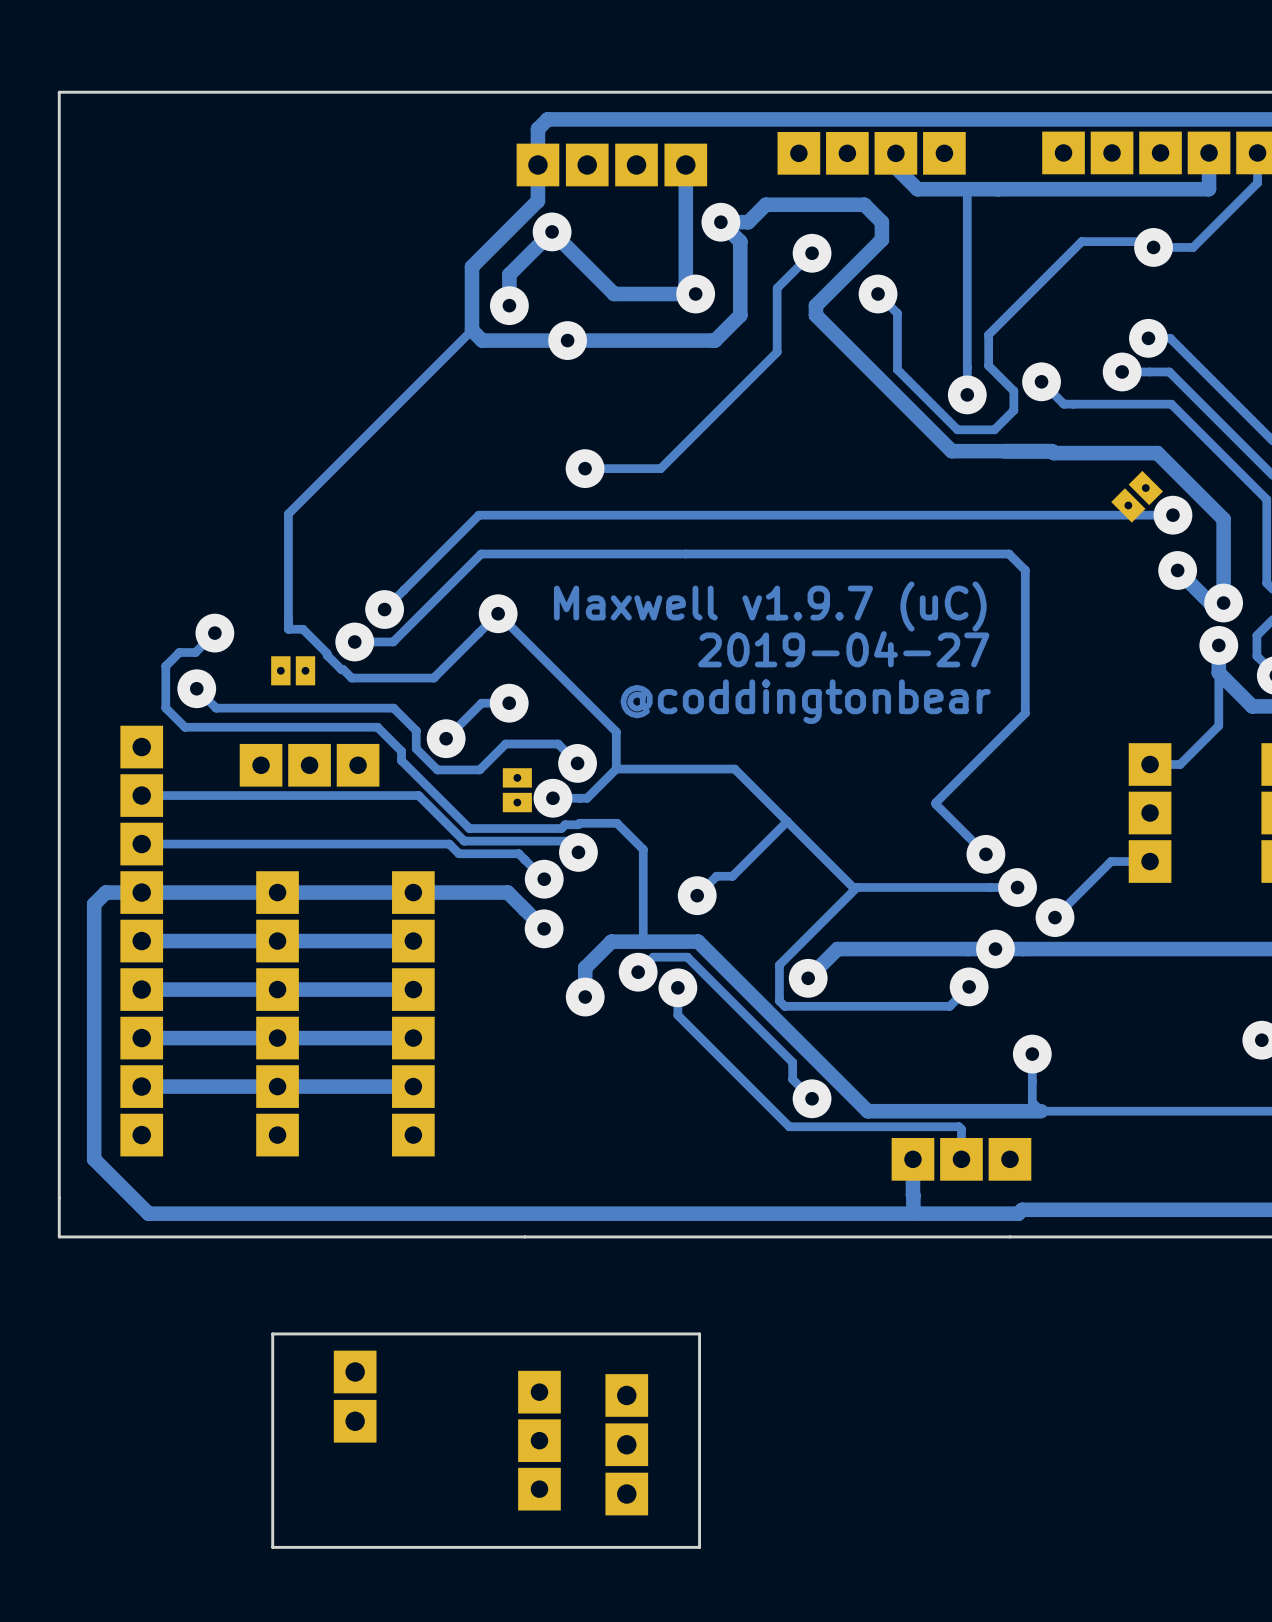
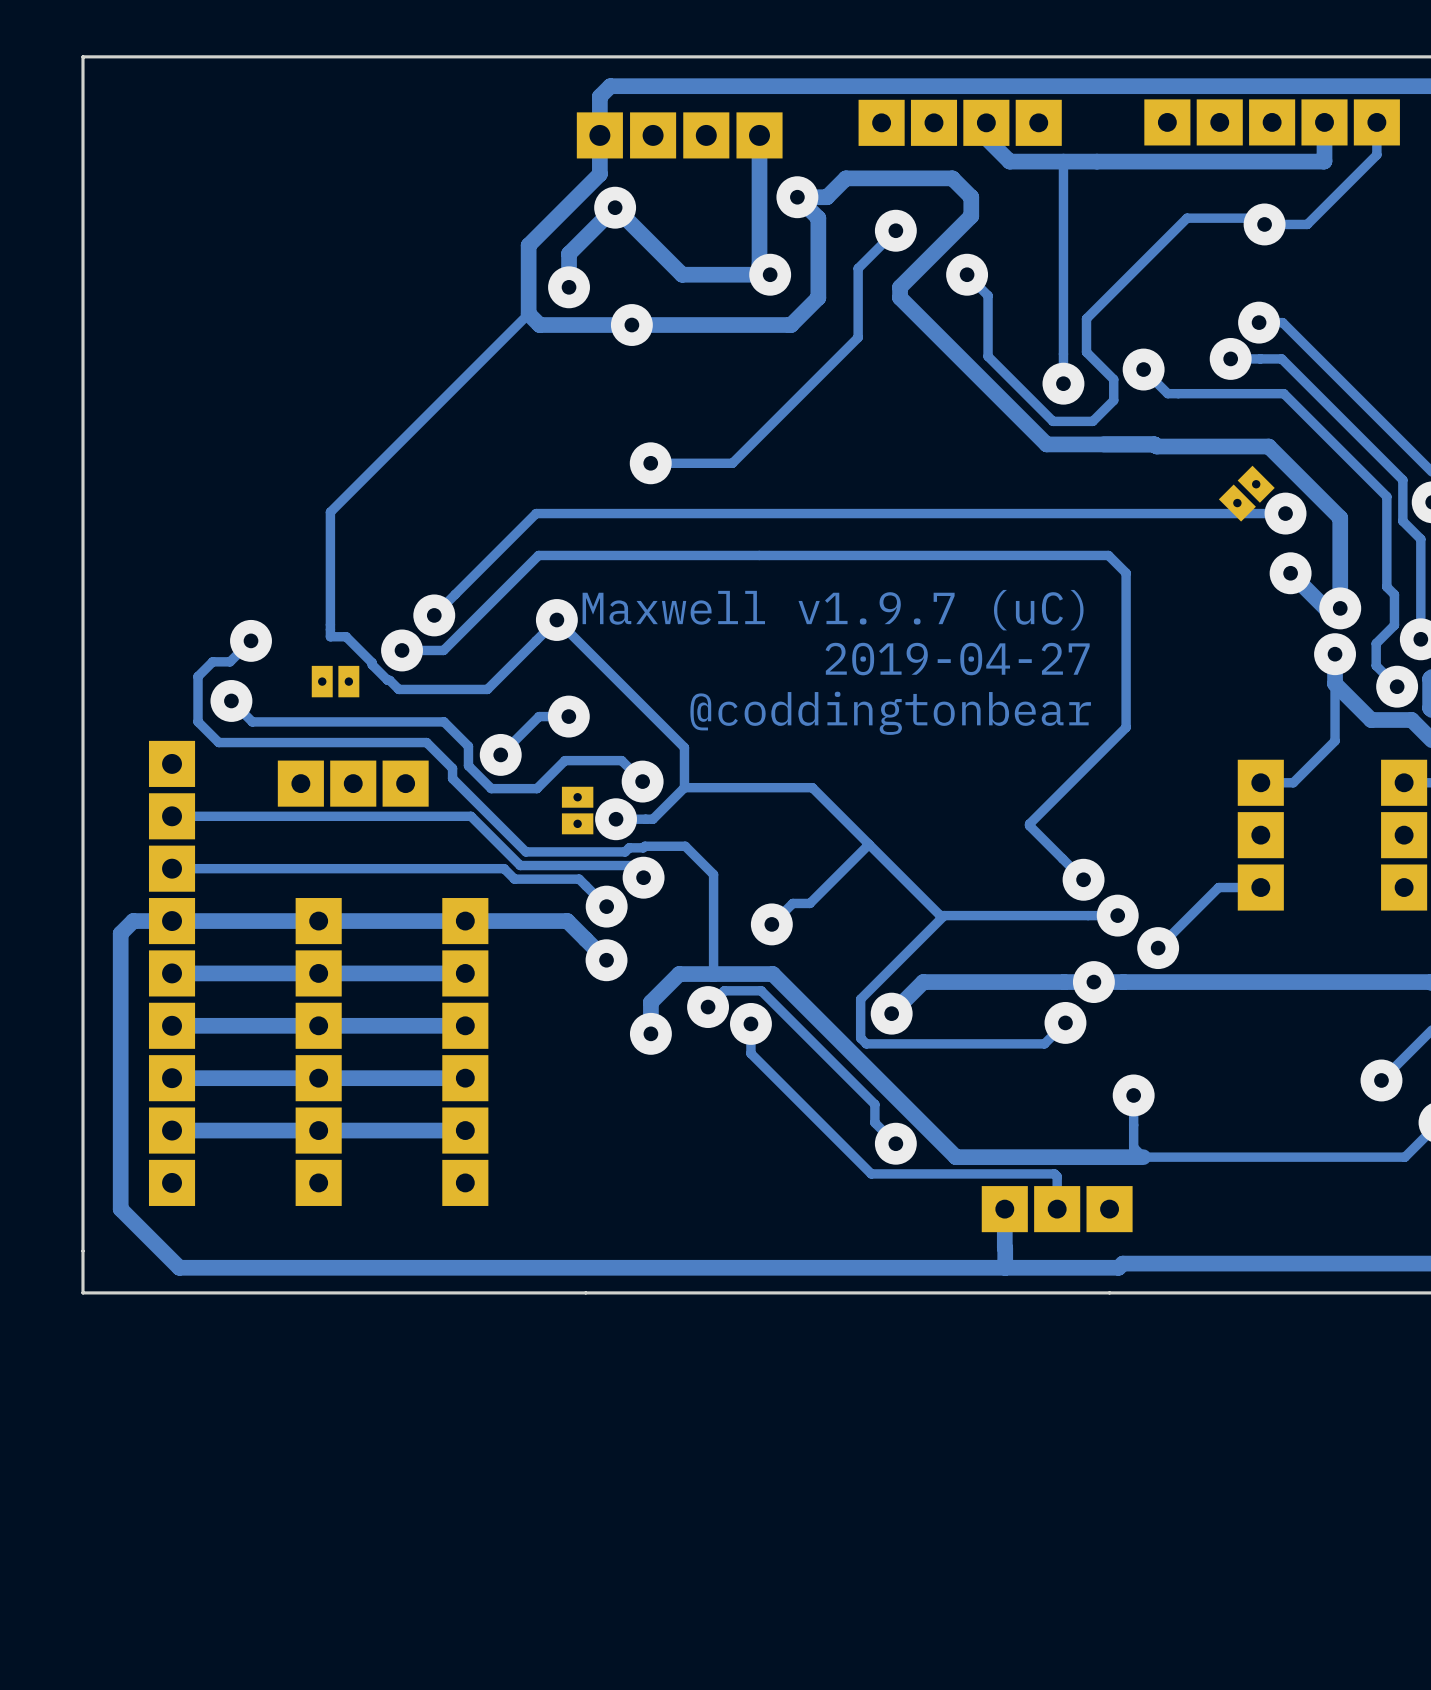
board edge: (699, 1333) (699, 1547) (272, 1547) (272, 1333) (699, 1333) -> none
part: (355, 1396) -> none
part: (539, 1440) -> none
part: (626, 1444) -> none

